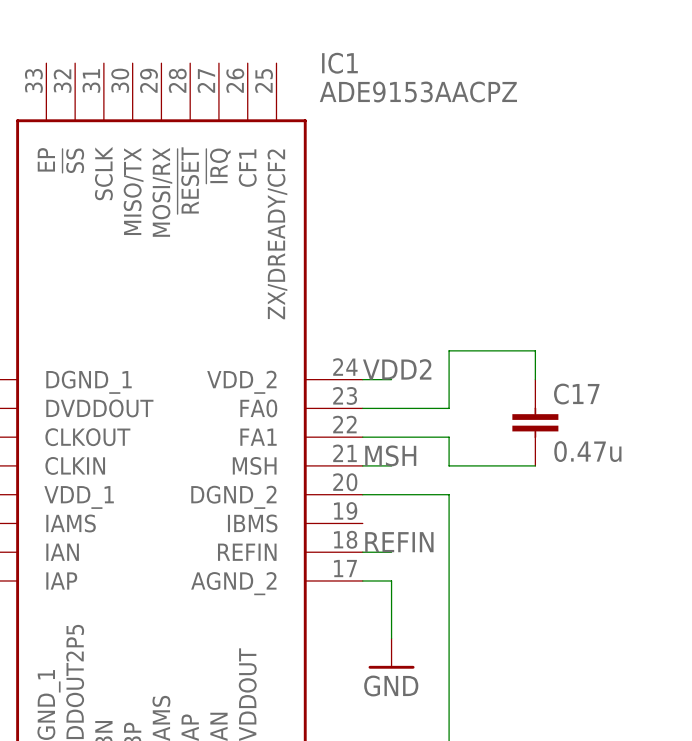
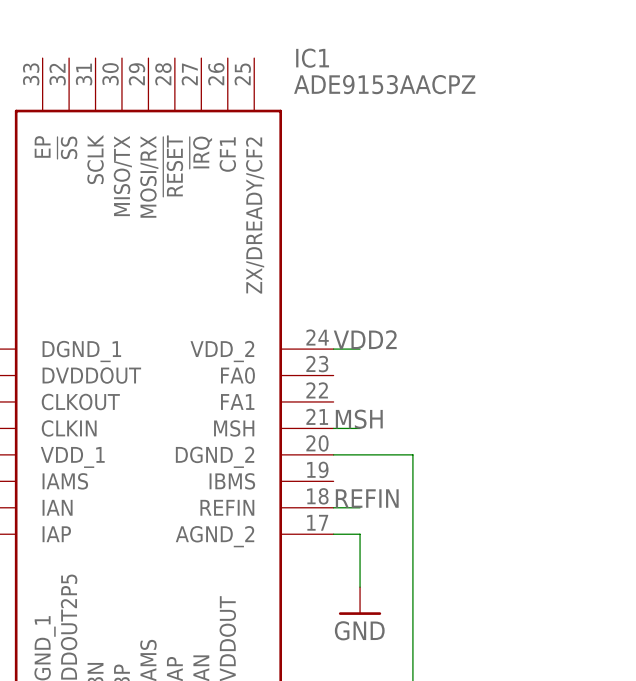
wire: (535, 379) (535, 350) (449, 350) (449, 408) (362, 408) -> none
C17: 0.47u (535, 422) -> none
wire: (362, 437) (449, 437) (449, 465) (535, 465) -> none

